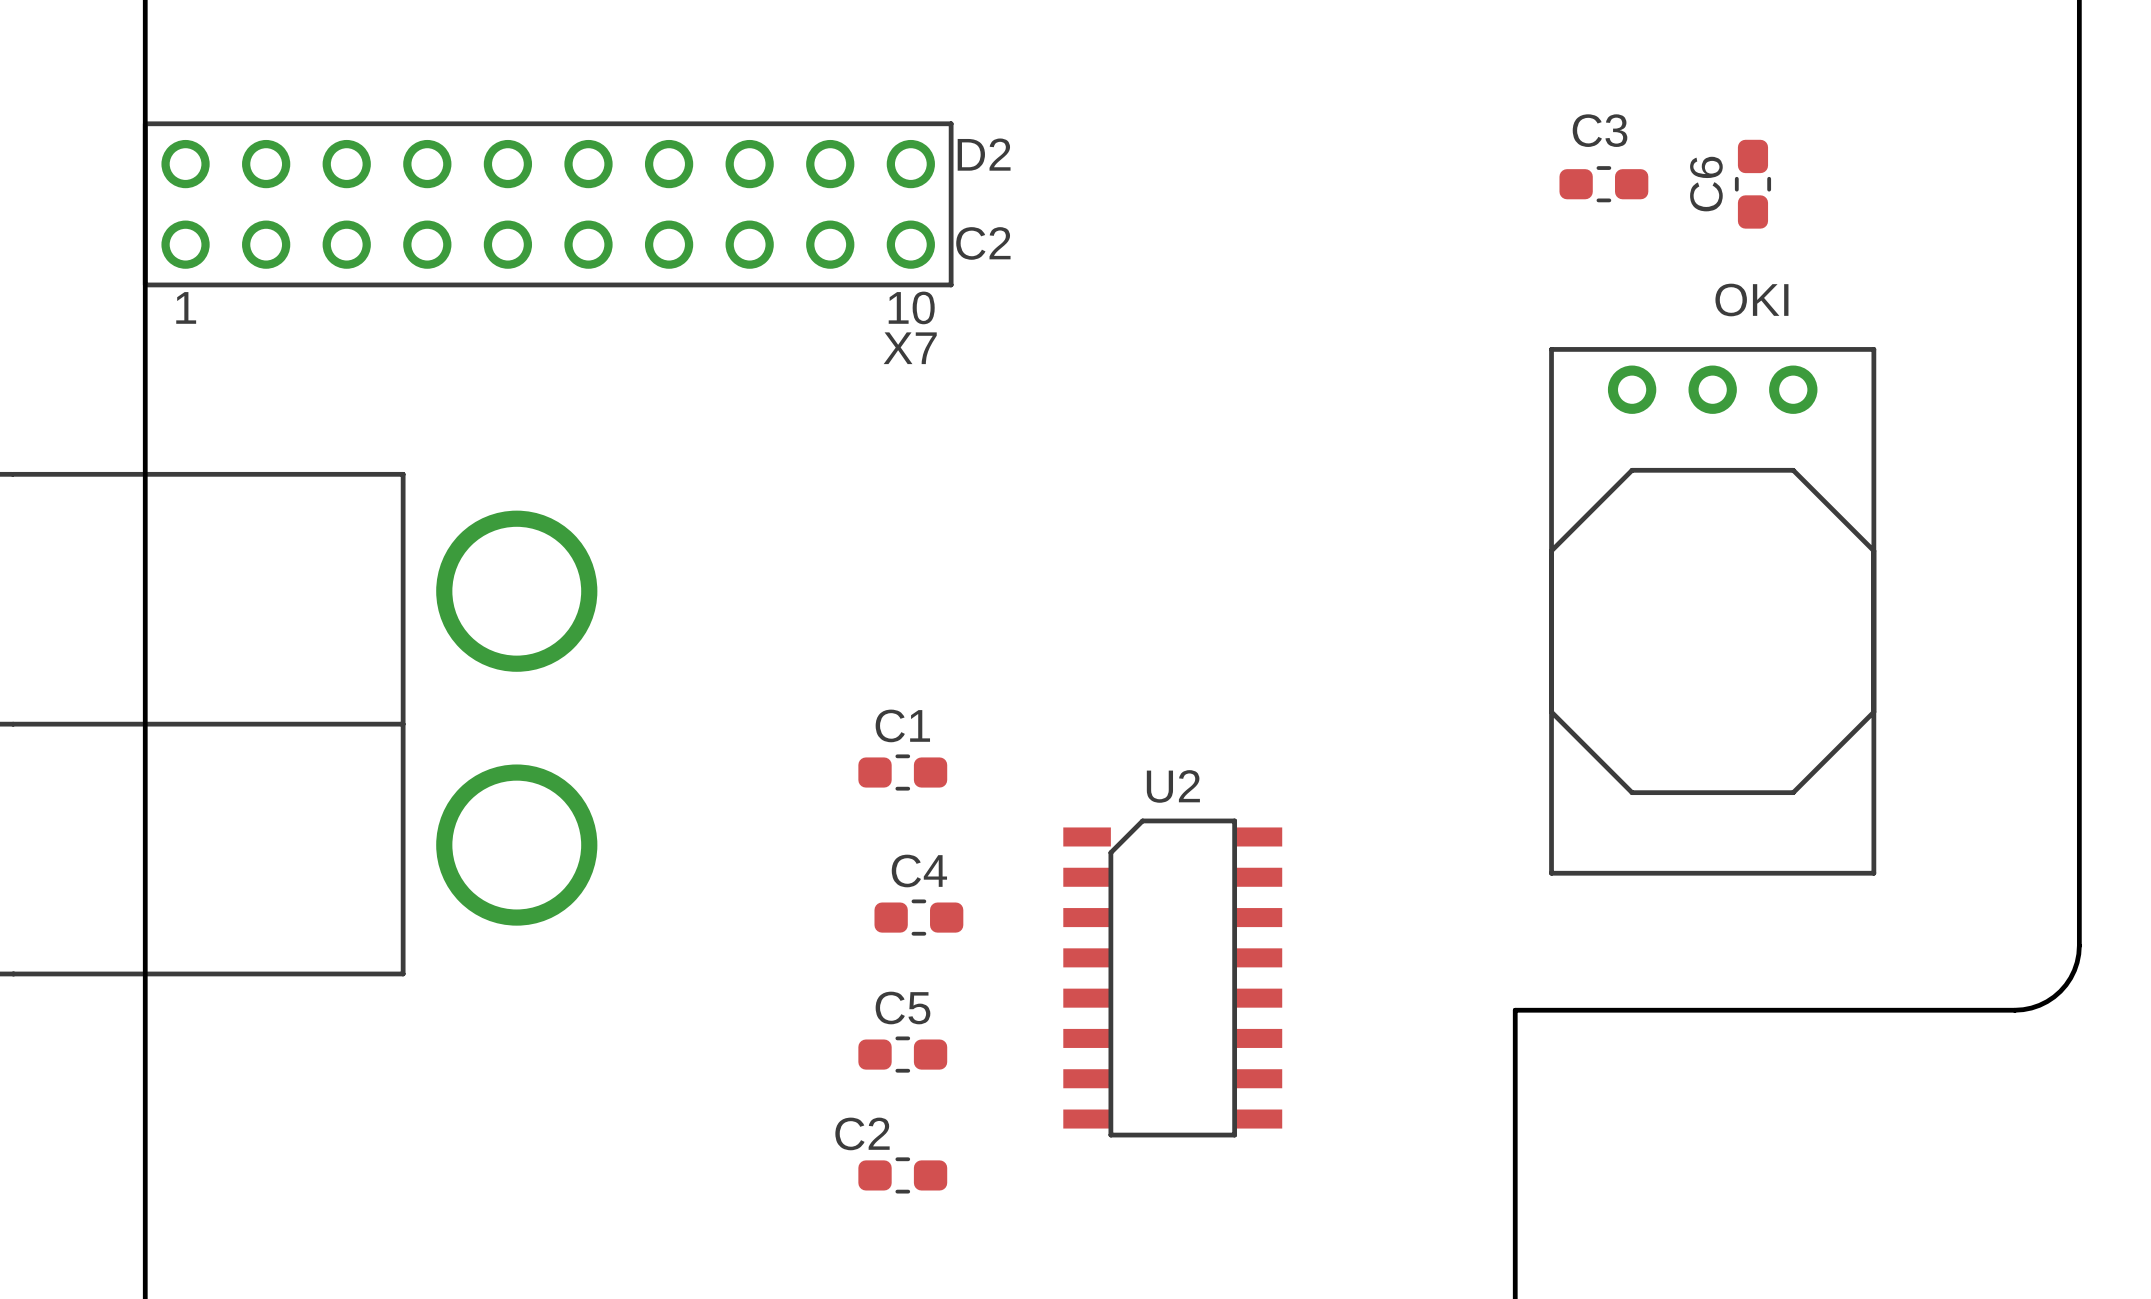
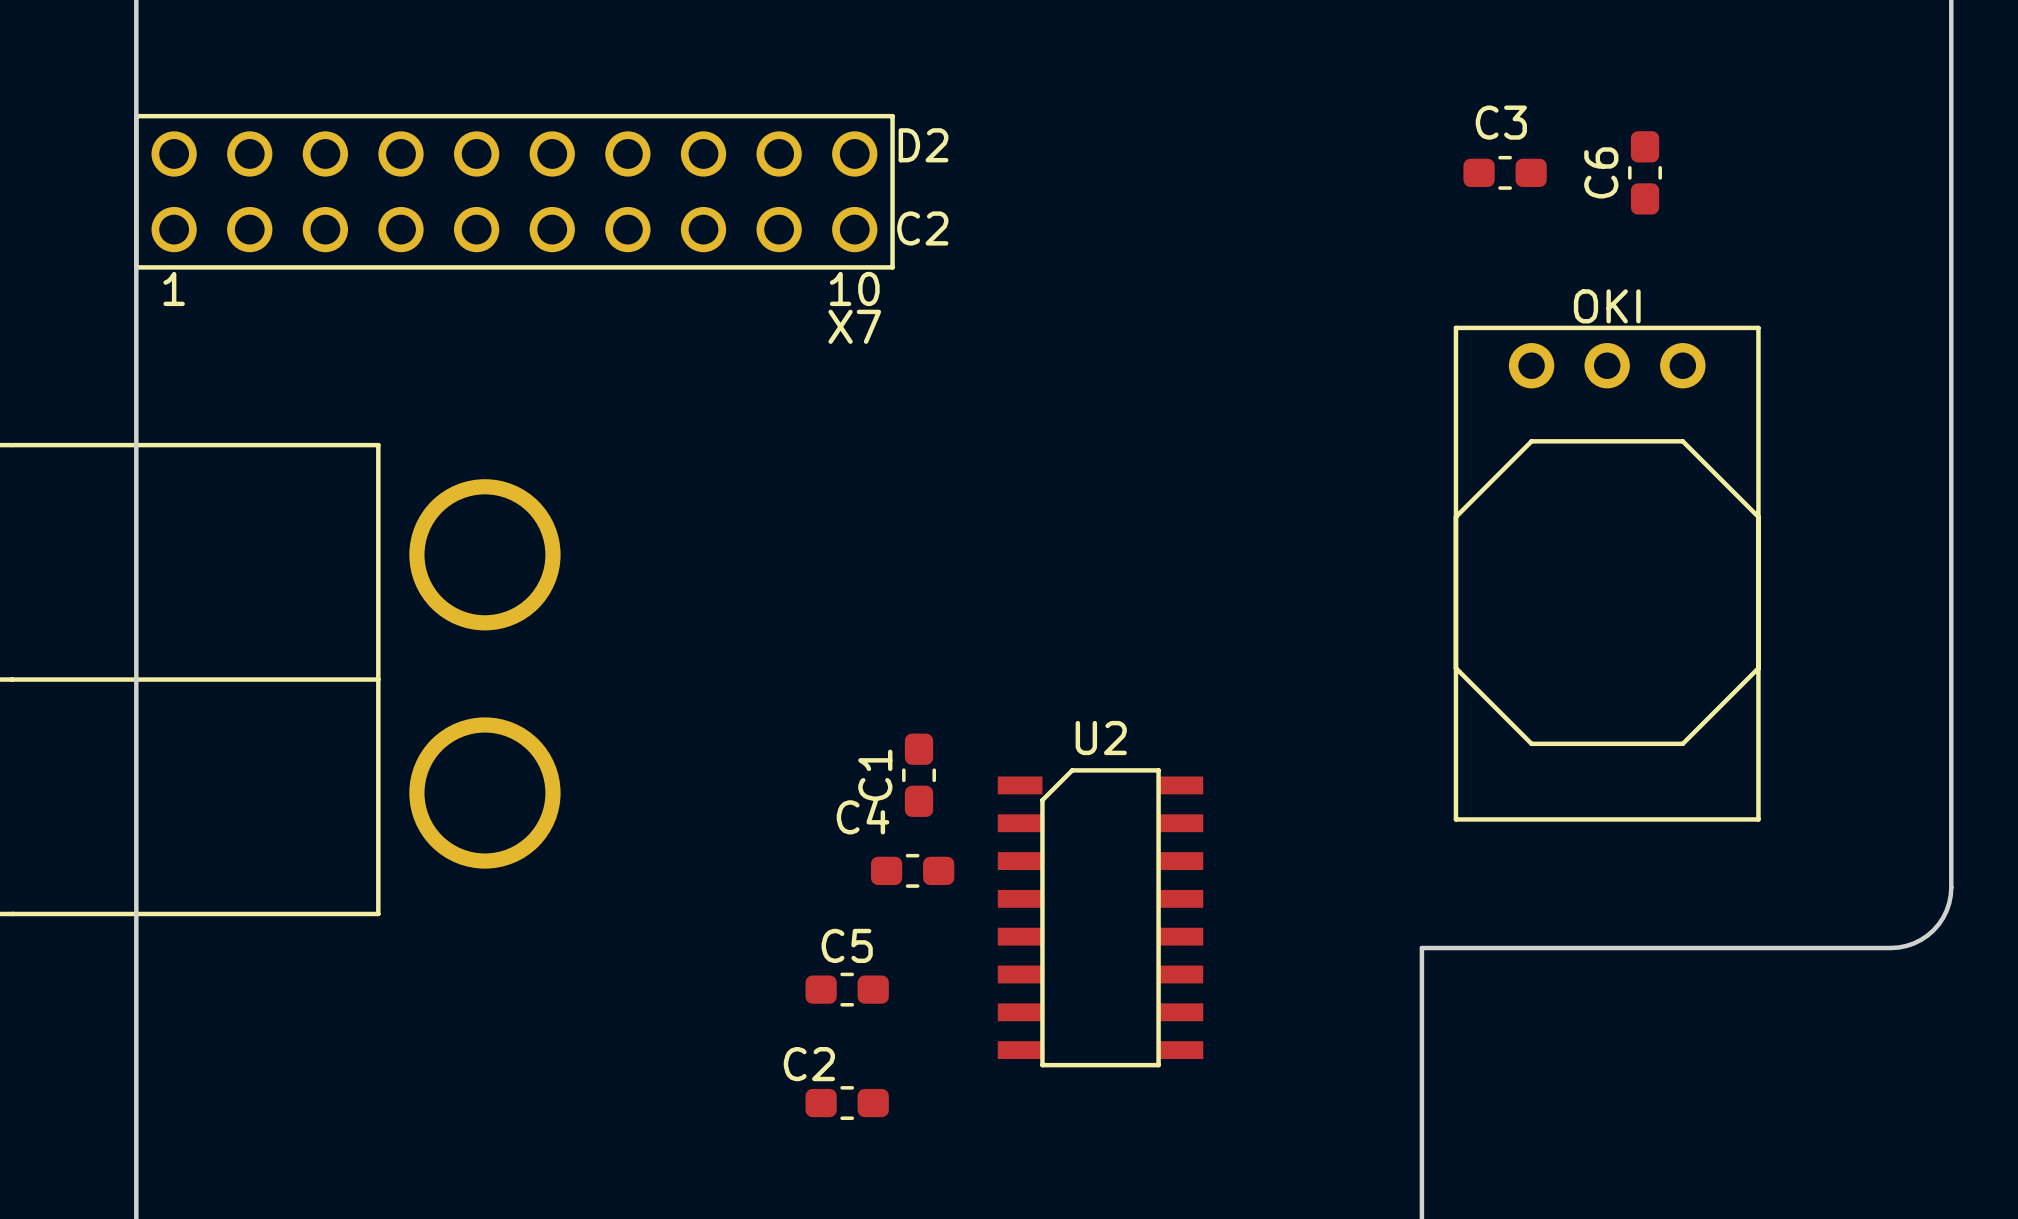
part value position: OKI (1751, 300) -> OKI (1607, 306)
C1 name position: C1 (902, 725) -> C1 (875, 775)
C1 rotation: 0° (902, 772) -> 90° clockwise (919, 775)
C1 position: (902, 772) -> (919, 775)
C4 position: (918, 917) -> (912, 870)

